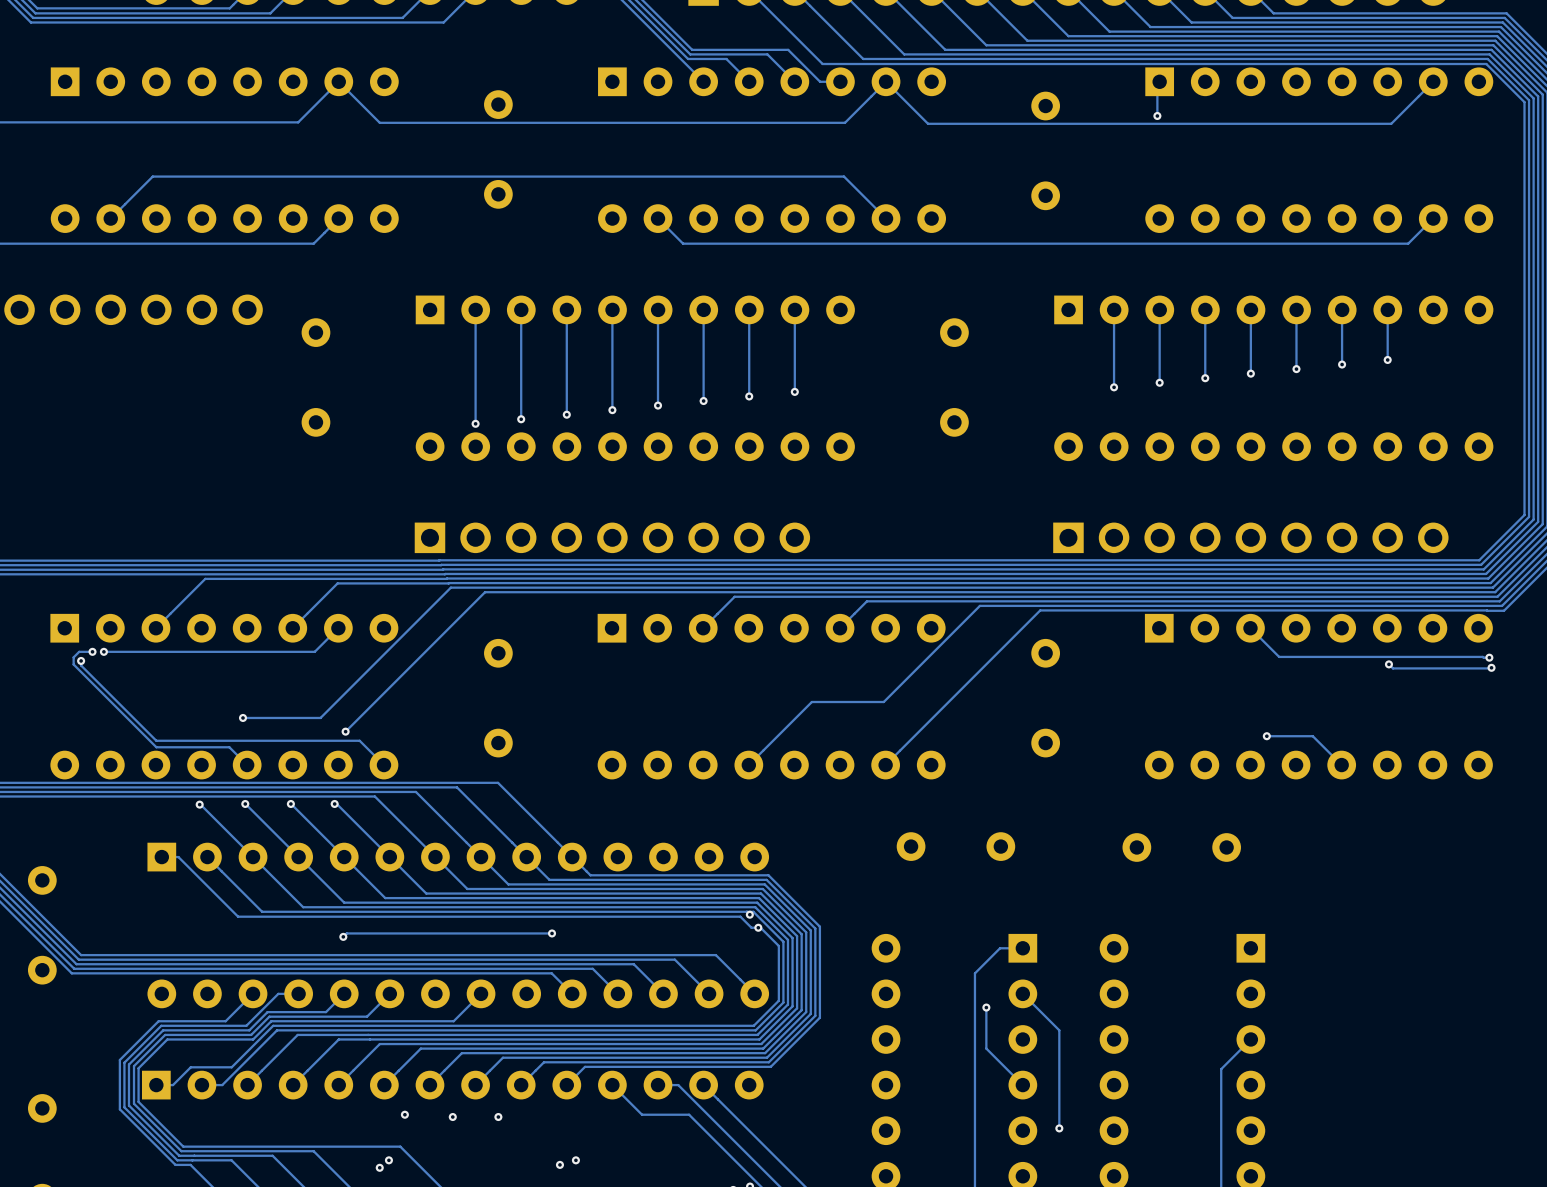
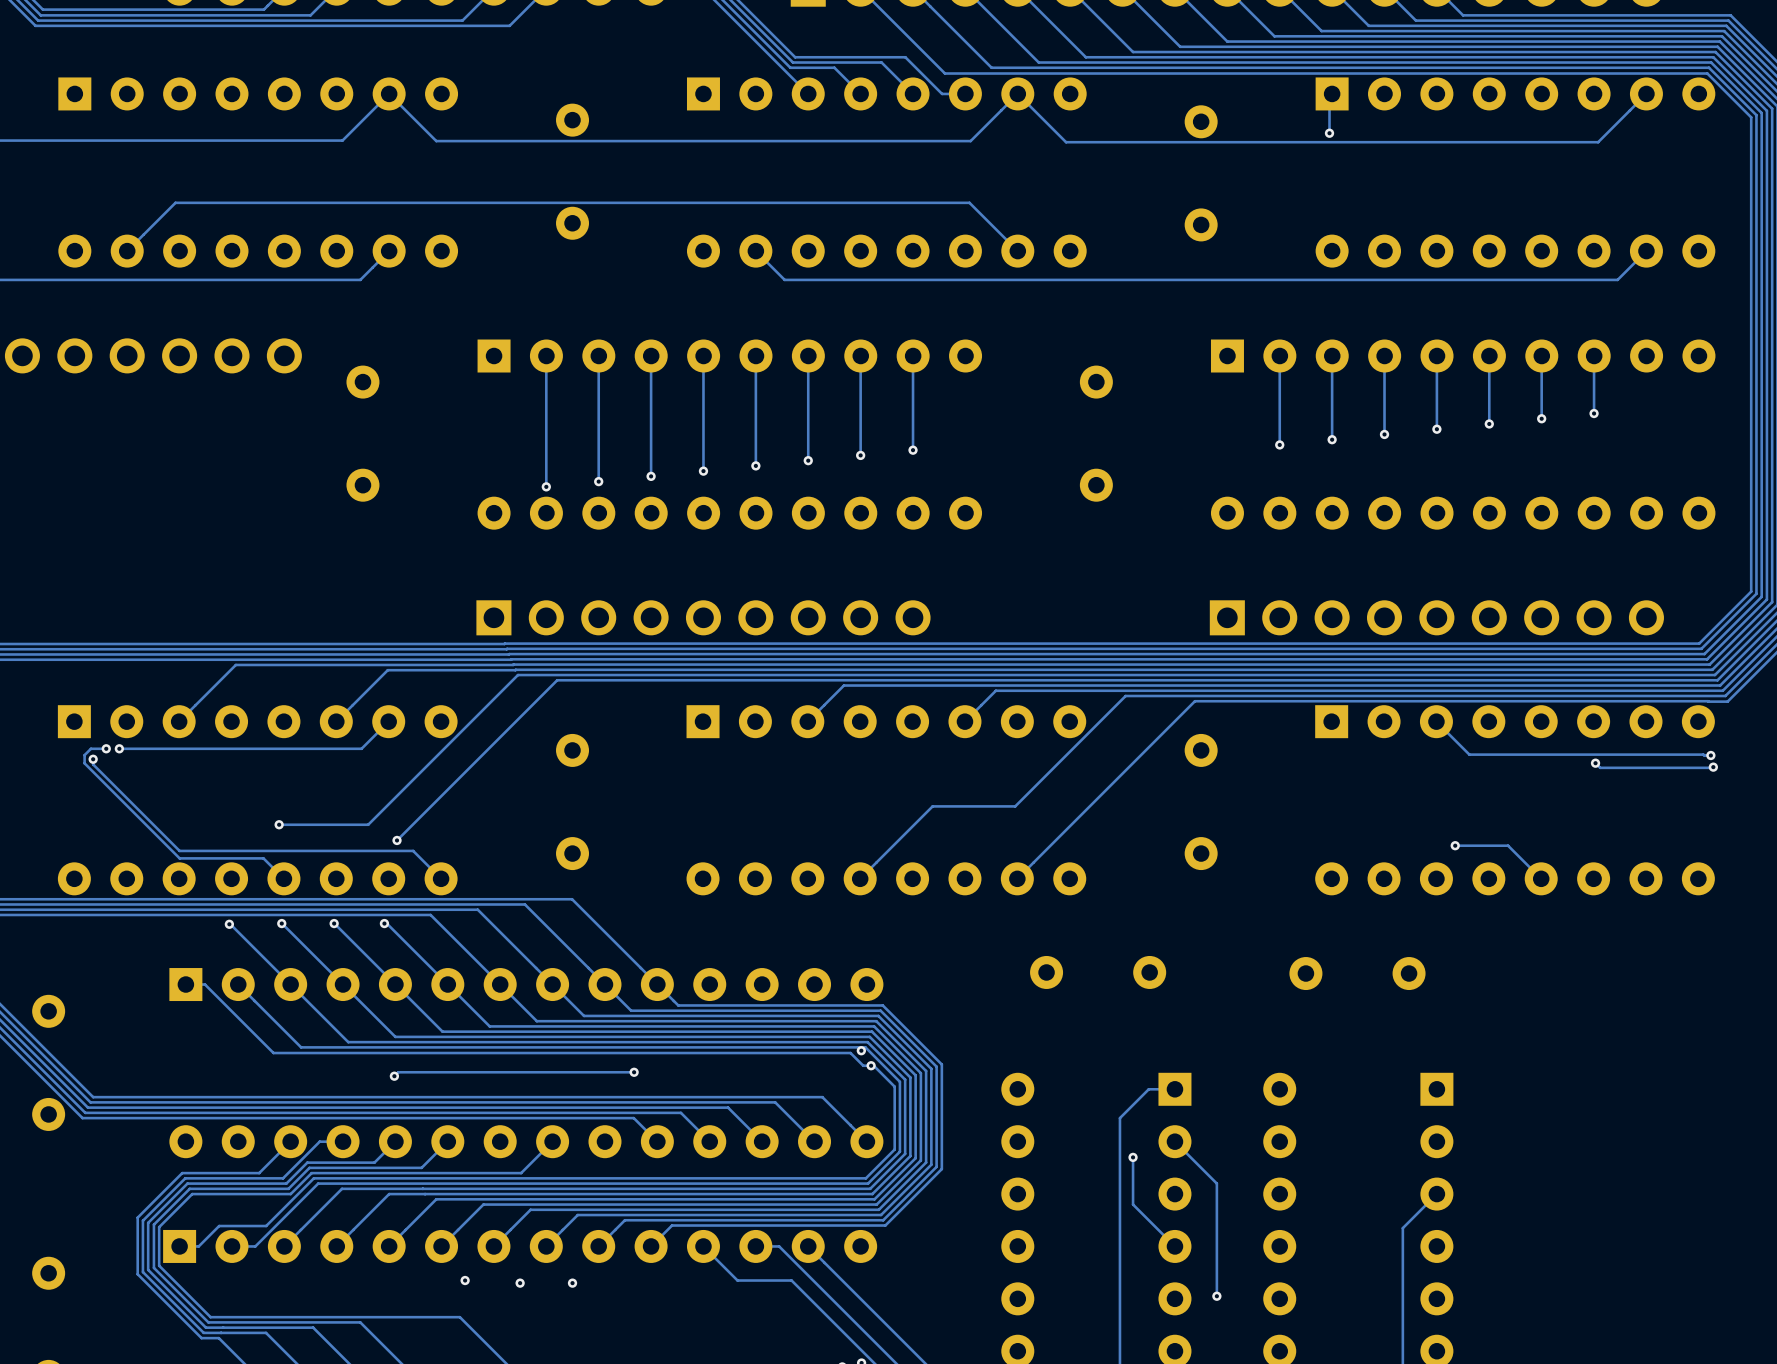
via: (388, 1160) -> none
via: (575, 1160) -> none
via: (559, 1164) -> none
via: (379, 1167) -> none

